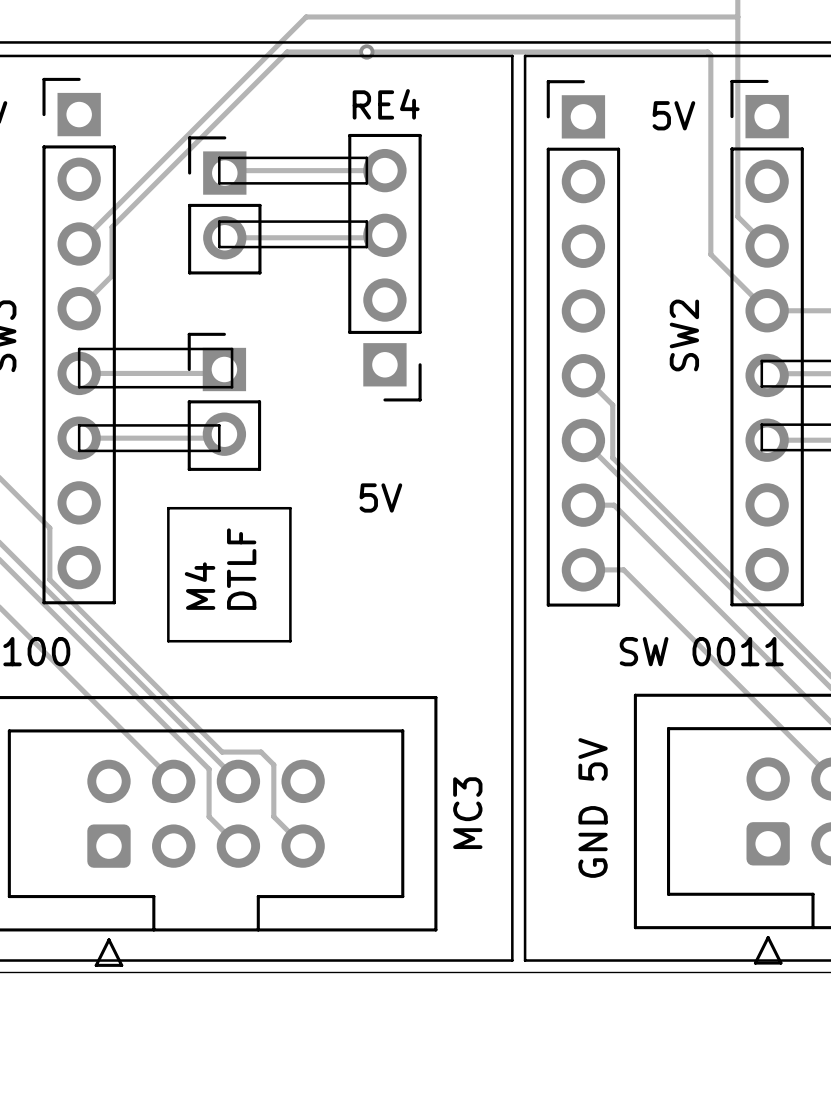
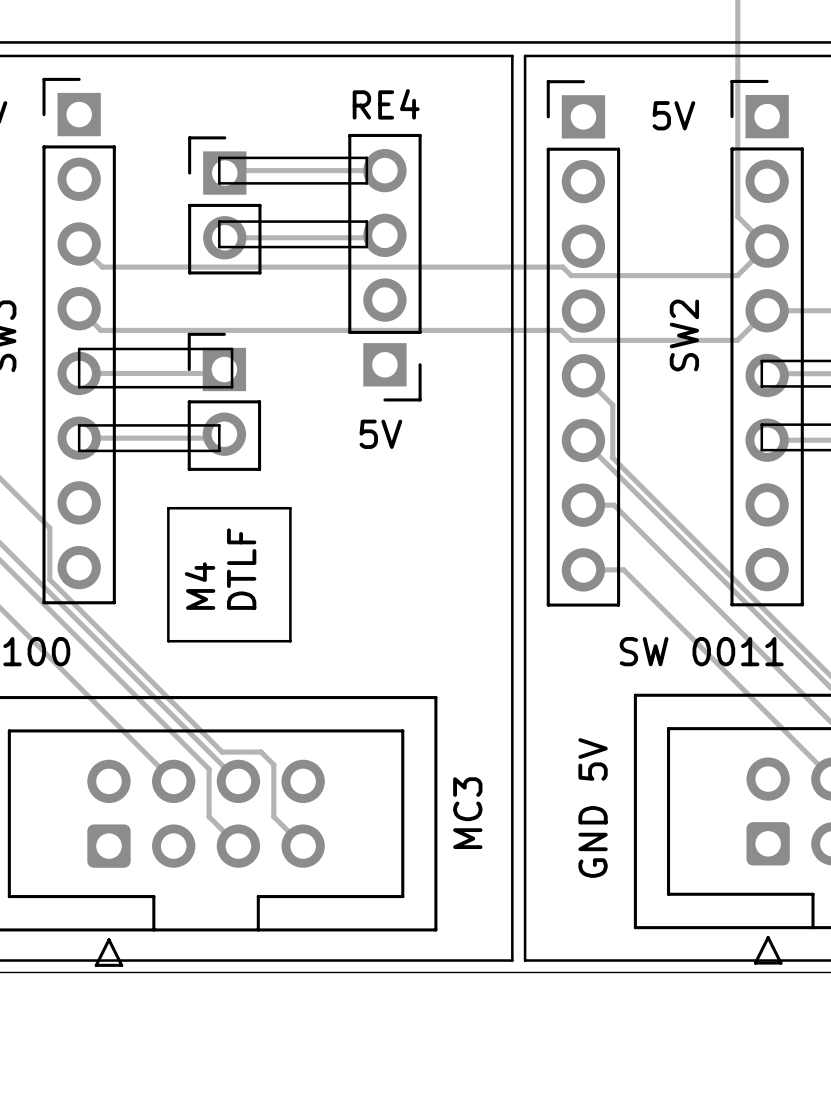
track: (737, 16) (306, 16) (79, 244) -> (767, 246) (737, 275) (571, 275) (562, 267) (102, 267) (79, 244)
via: (366, 51) -> none
track: (79, 308) (112, 275) (112, 227) (287, 51) (707, 51) (710, 55) (710, 254) (767, 310) -> (79, 308) (100, 330) (561, 330) (571, 340) (737, 340) (767, 310)
text position: 5V (380, 497) -> 5V (380, 434)

